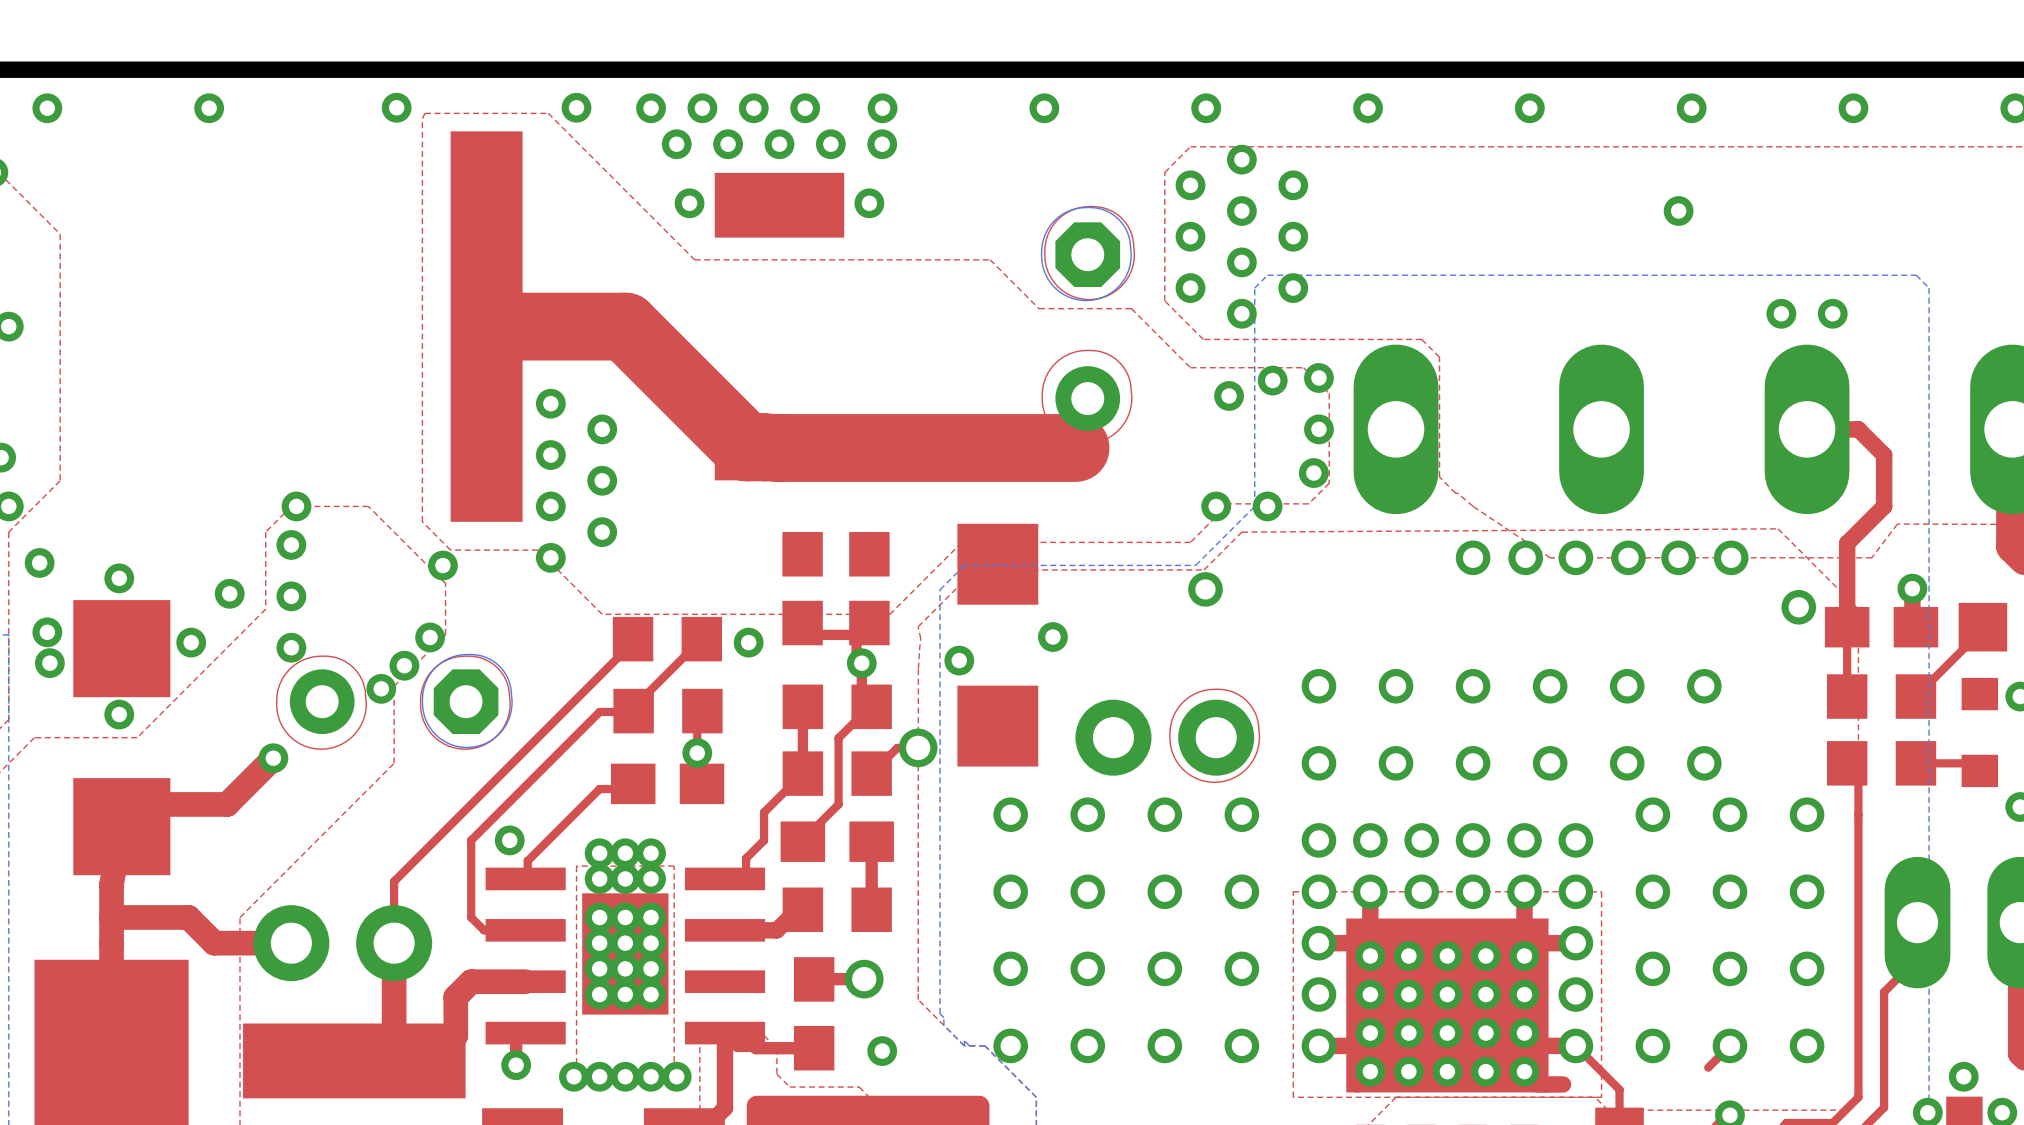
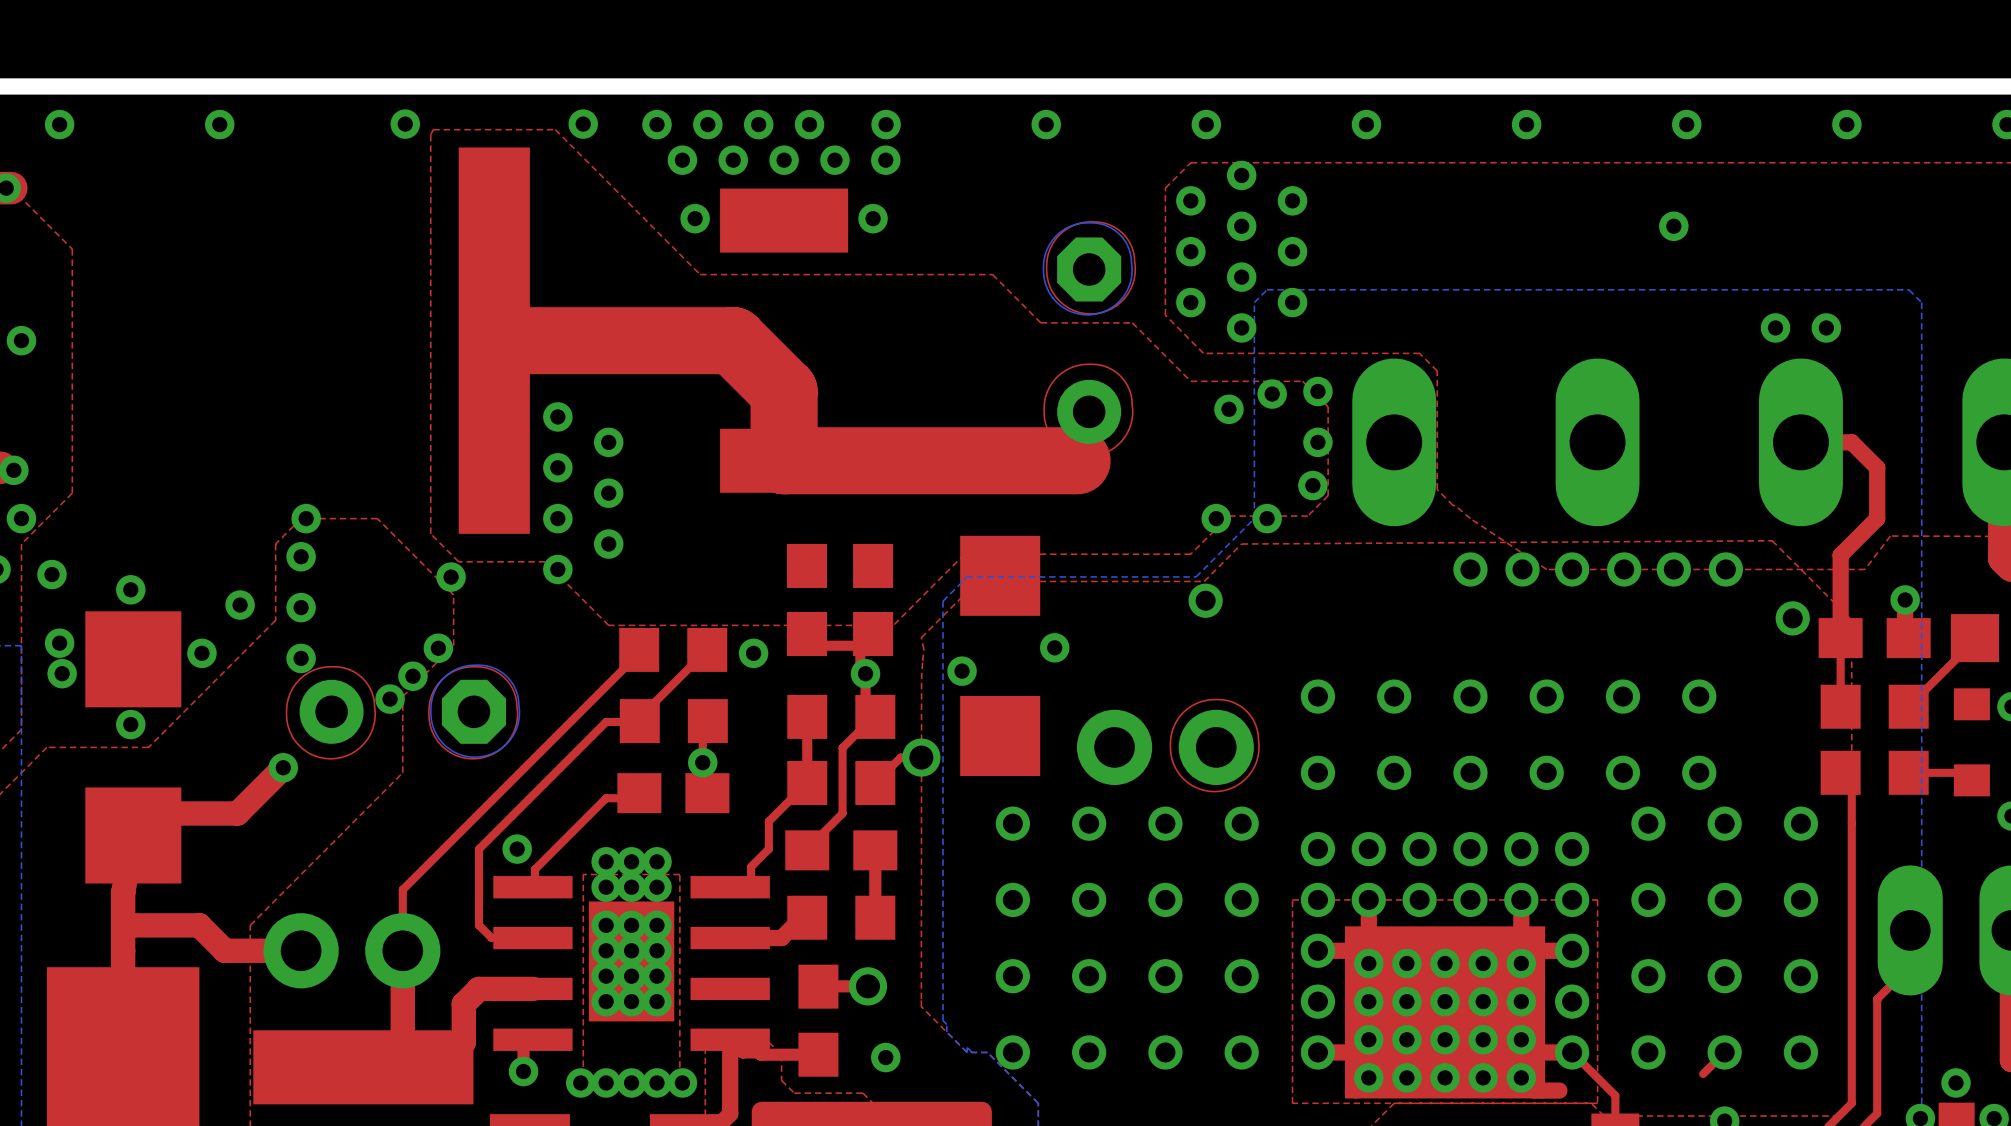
top track: (625, 326) (746, 447) (779, 447) -> (631, 340) (733, 340) (784, 391) (784, 460)

